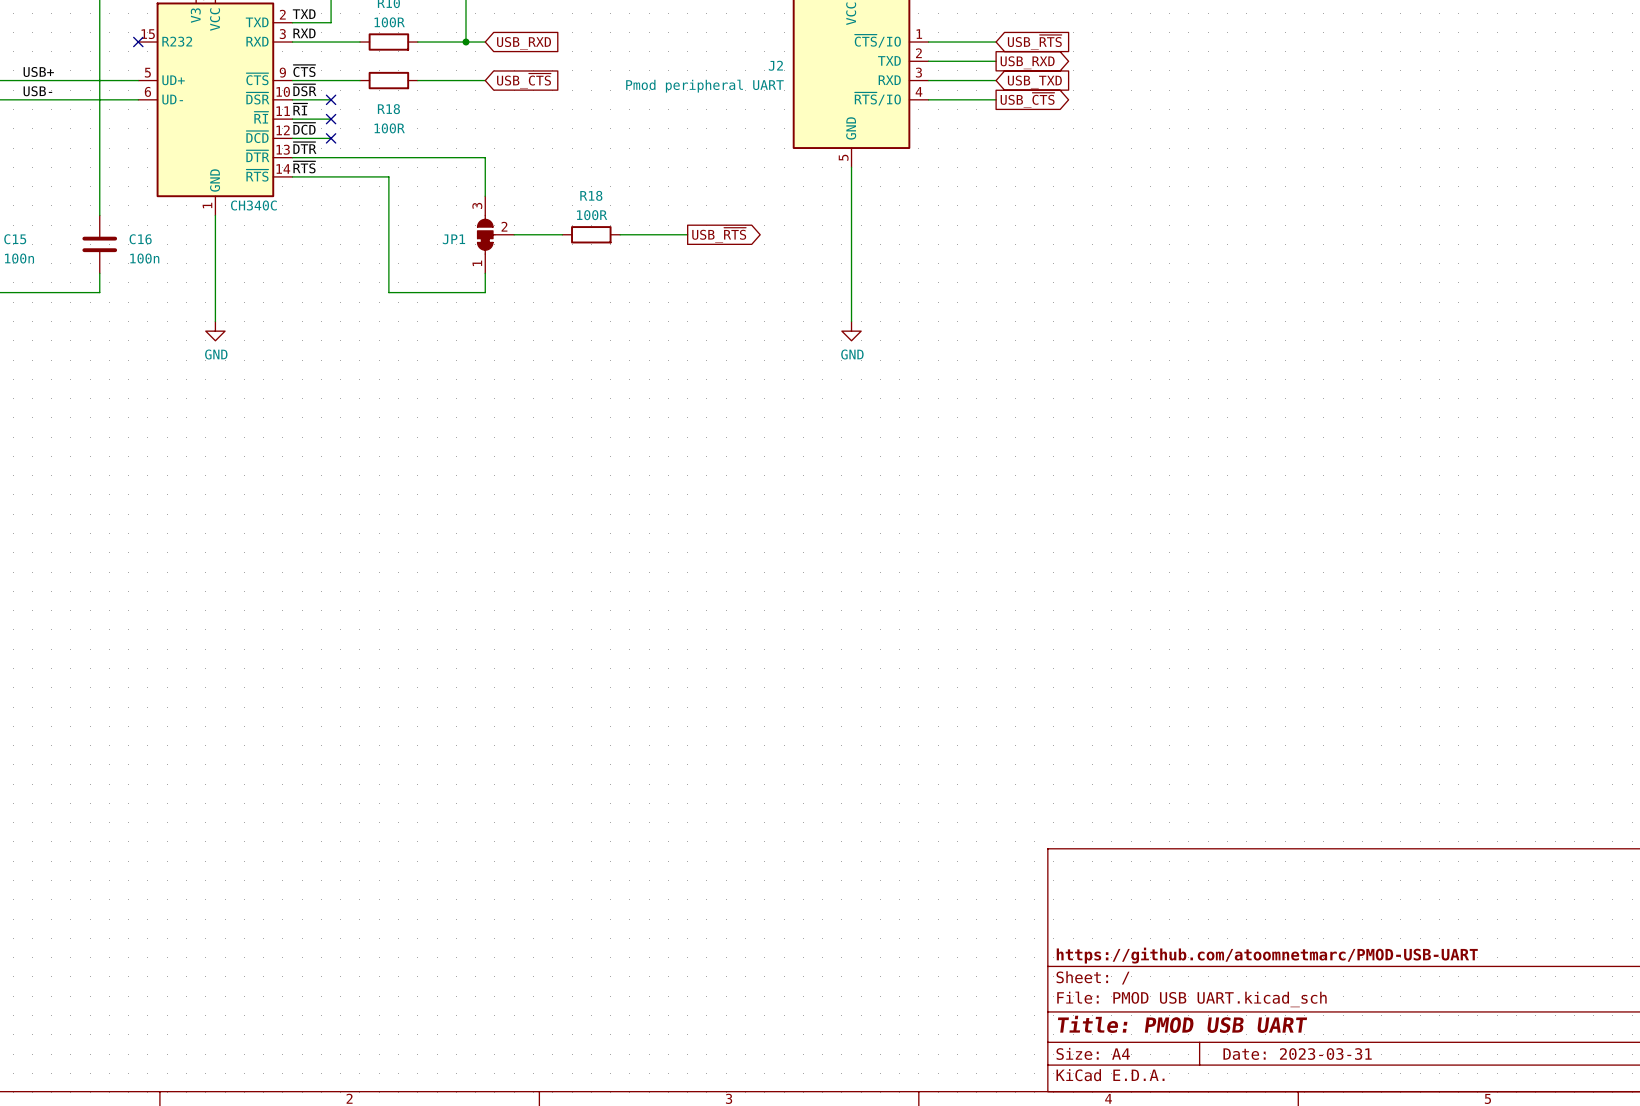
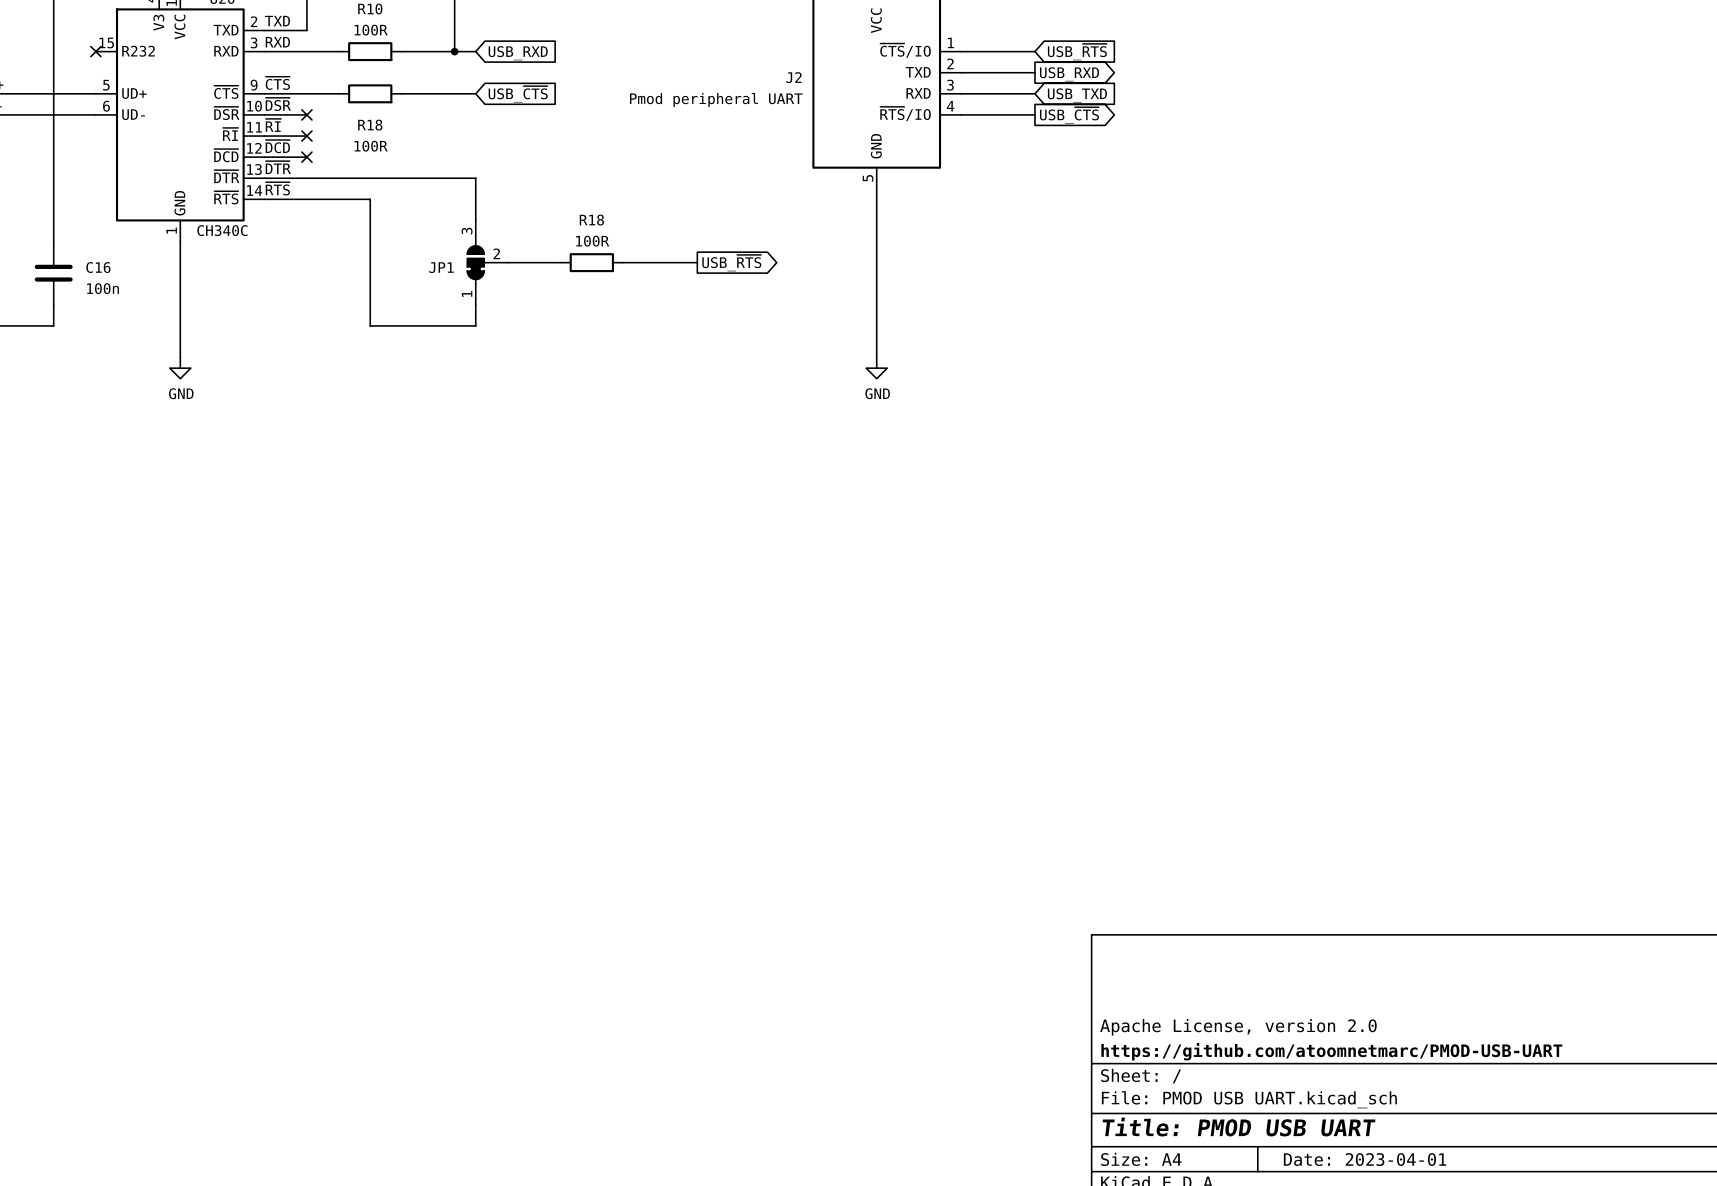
title block: none -> Apache License, version 2.0 (1238, 1027)
title block: Date: 2023-03-31 (1297, 1054) -> Date: 2023-04-01 (1365, 1159)

